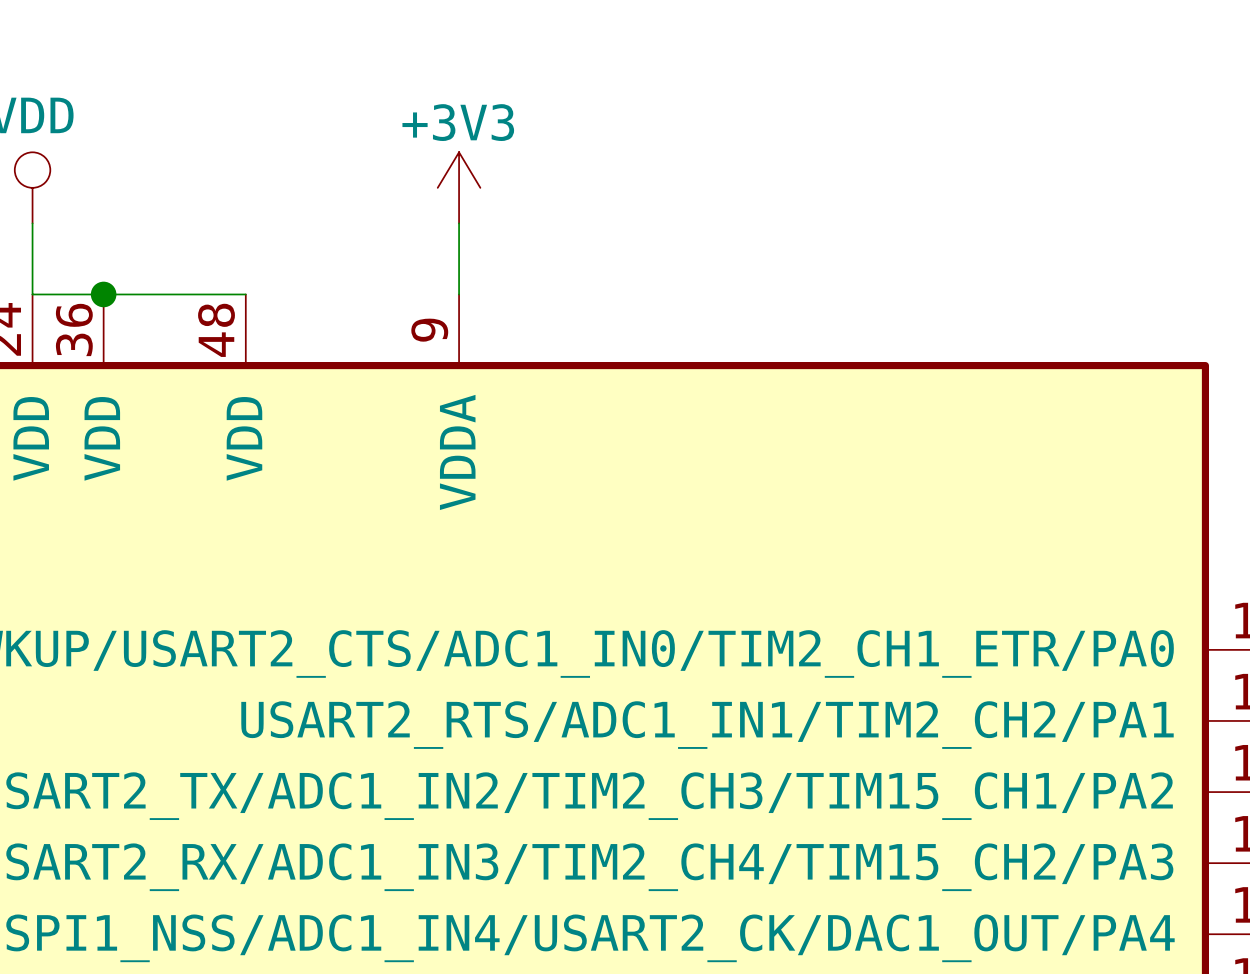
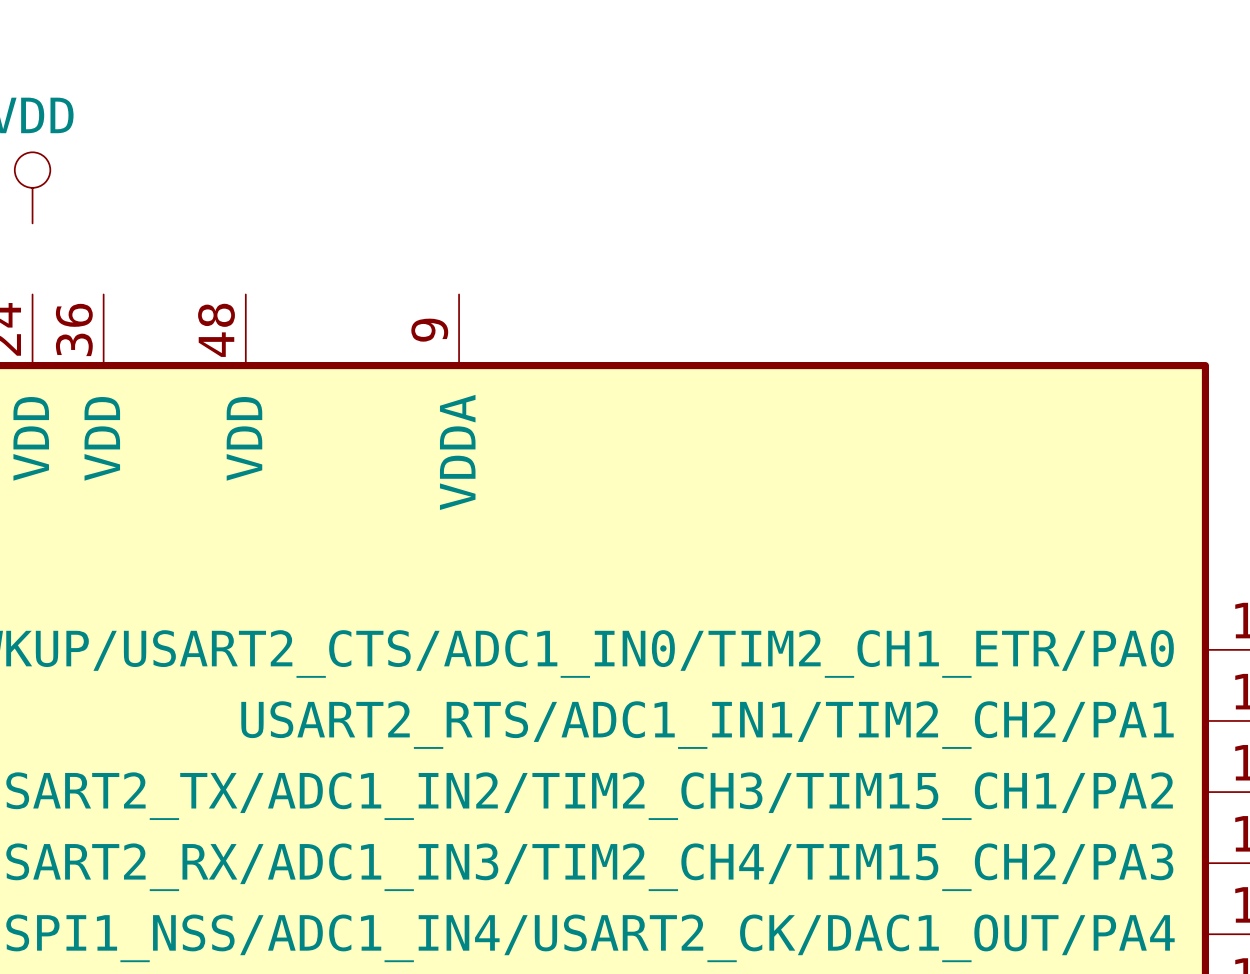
power symbol: +3V3 (459, 187) -> none
wire: (32, 223) (32, 294) (245, 294) -> none
wire: (459, 223) (459, 294) -> none
junction: (103, 294) -> none

